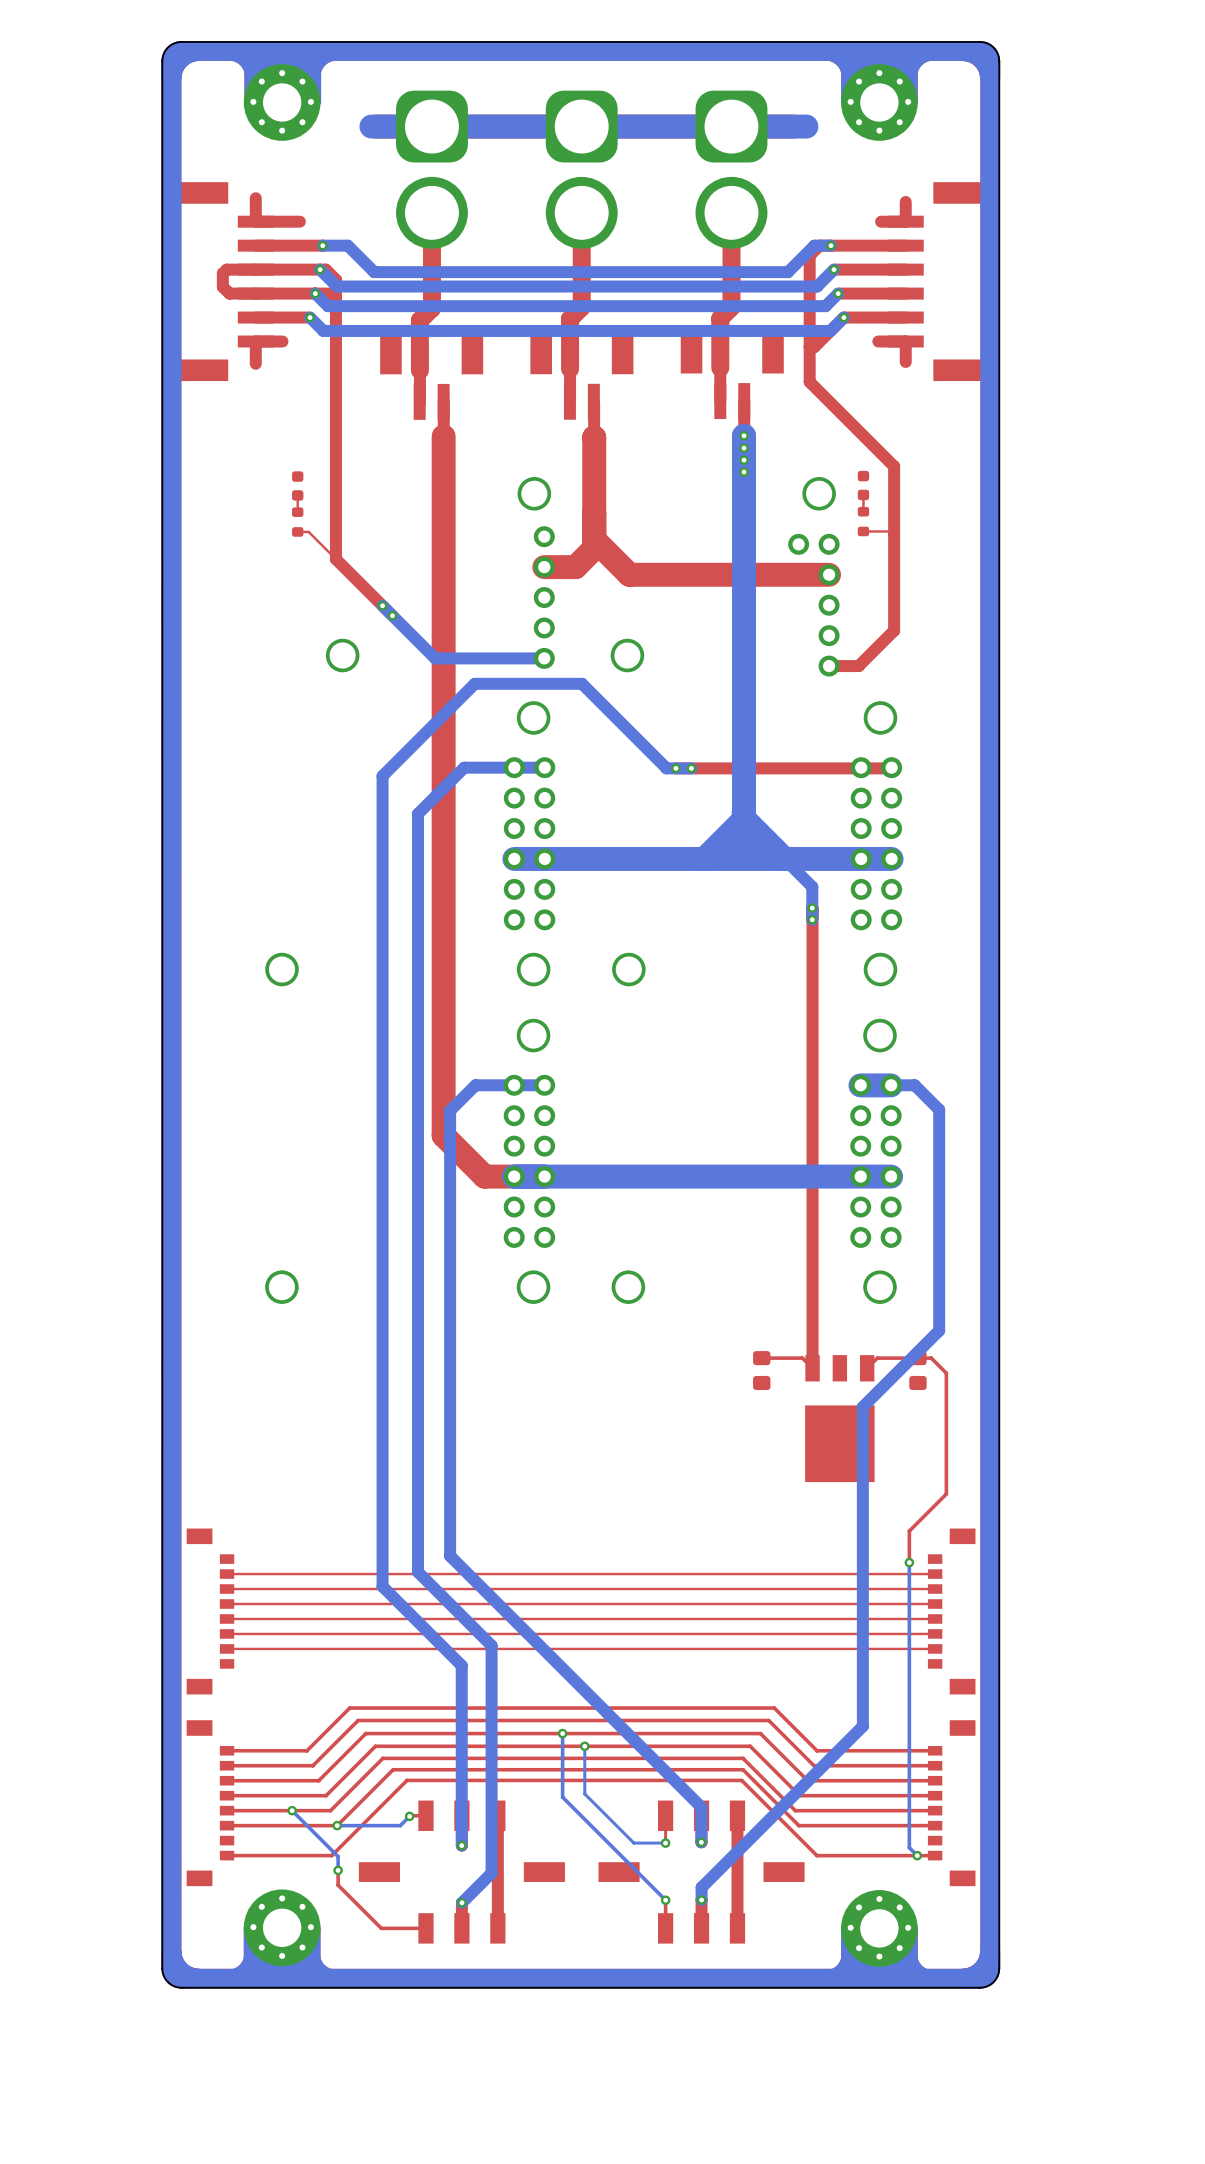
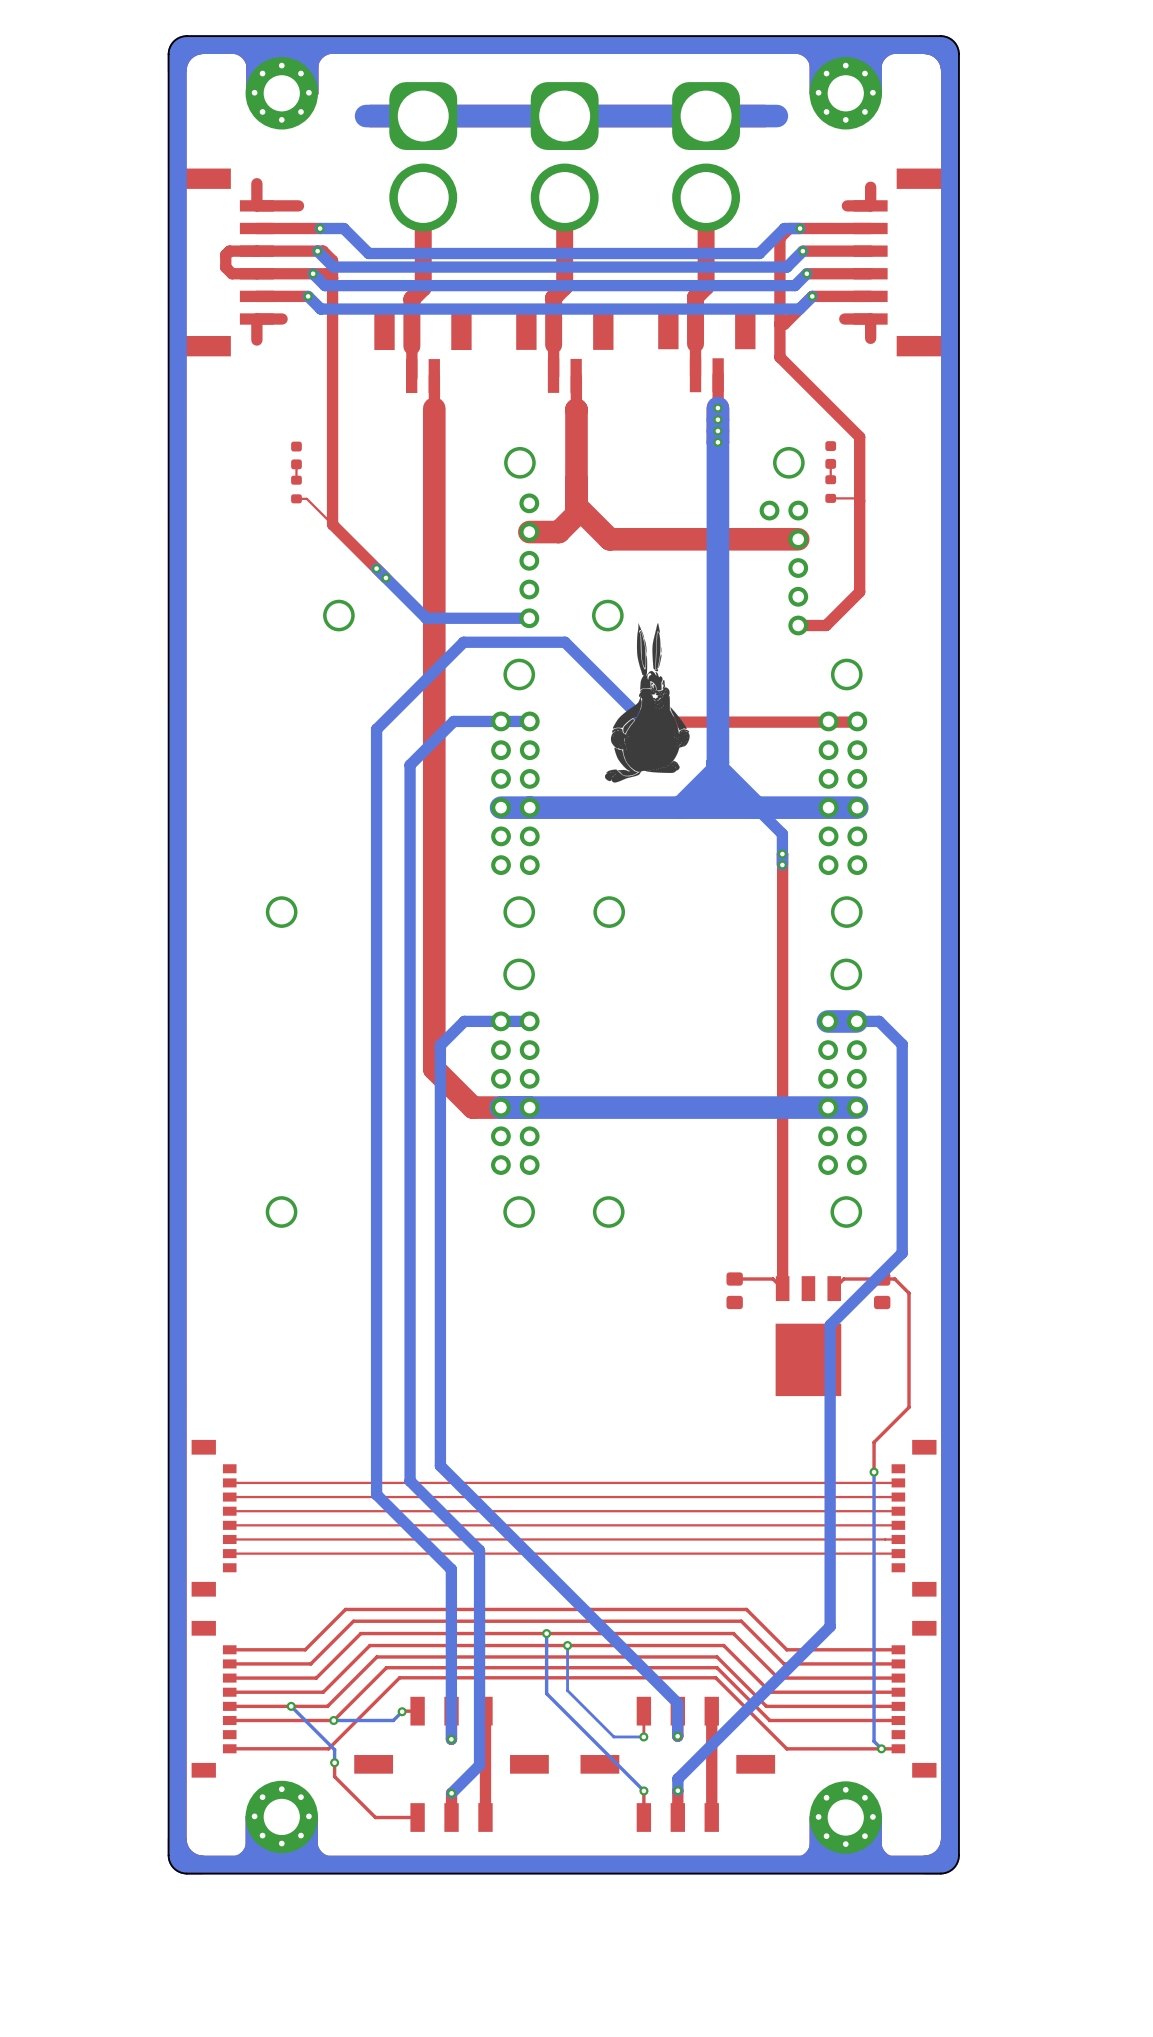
drawing: none -> [604, 623, 690, 783]

